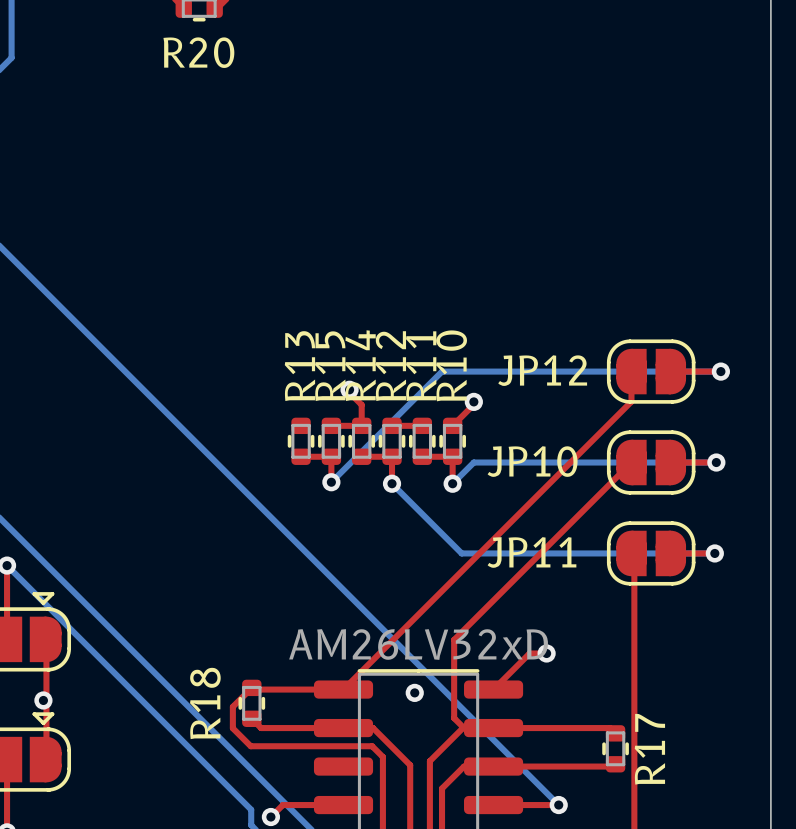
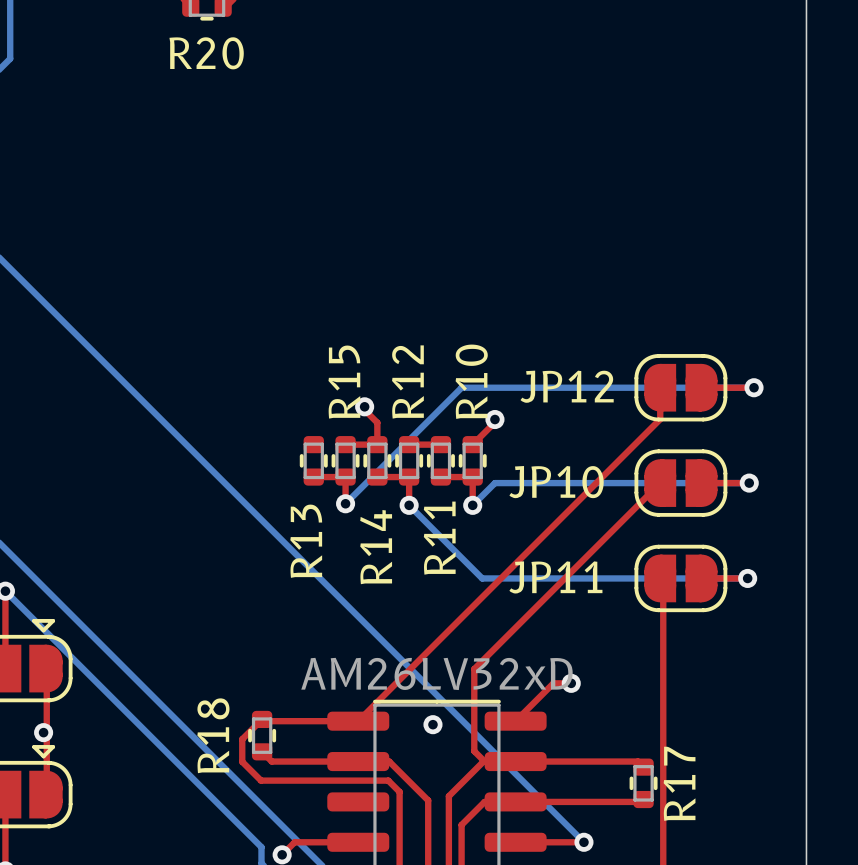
R14 name position: R14 (360, 365) -> R14 (376, 547)
R13 name position: R13 (299, 366) -> R13 (306, 541)
R11 name position: R11 (421, 366) -> R11 (439, 538)

